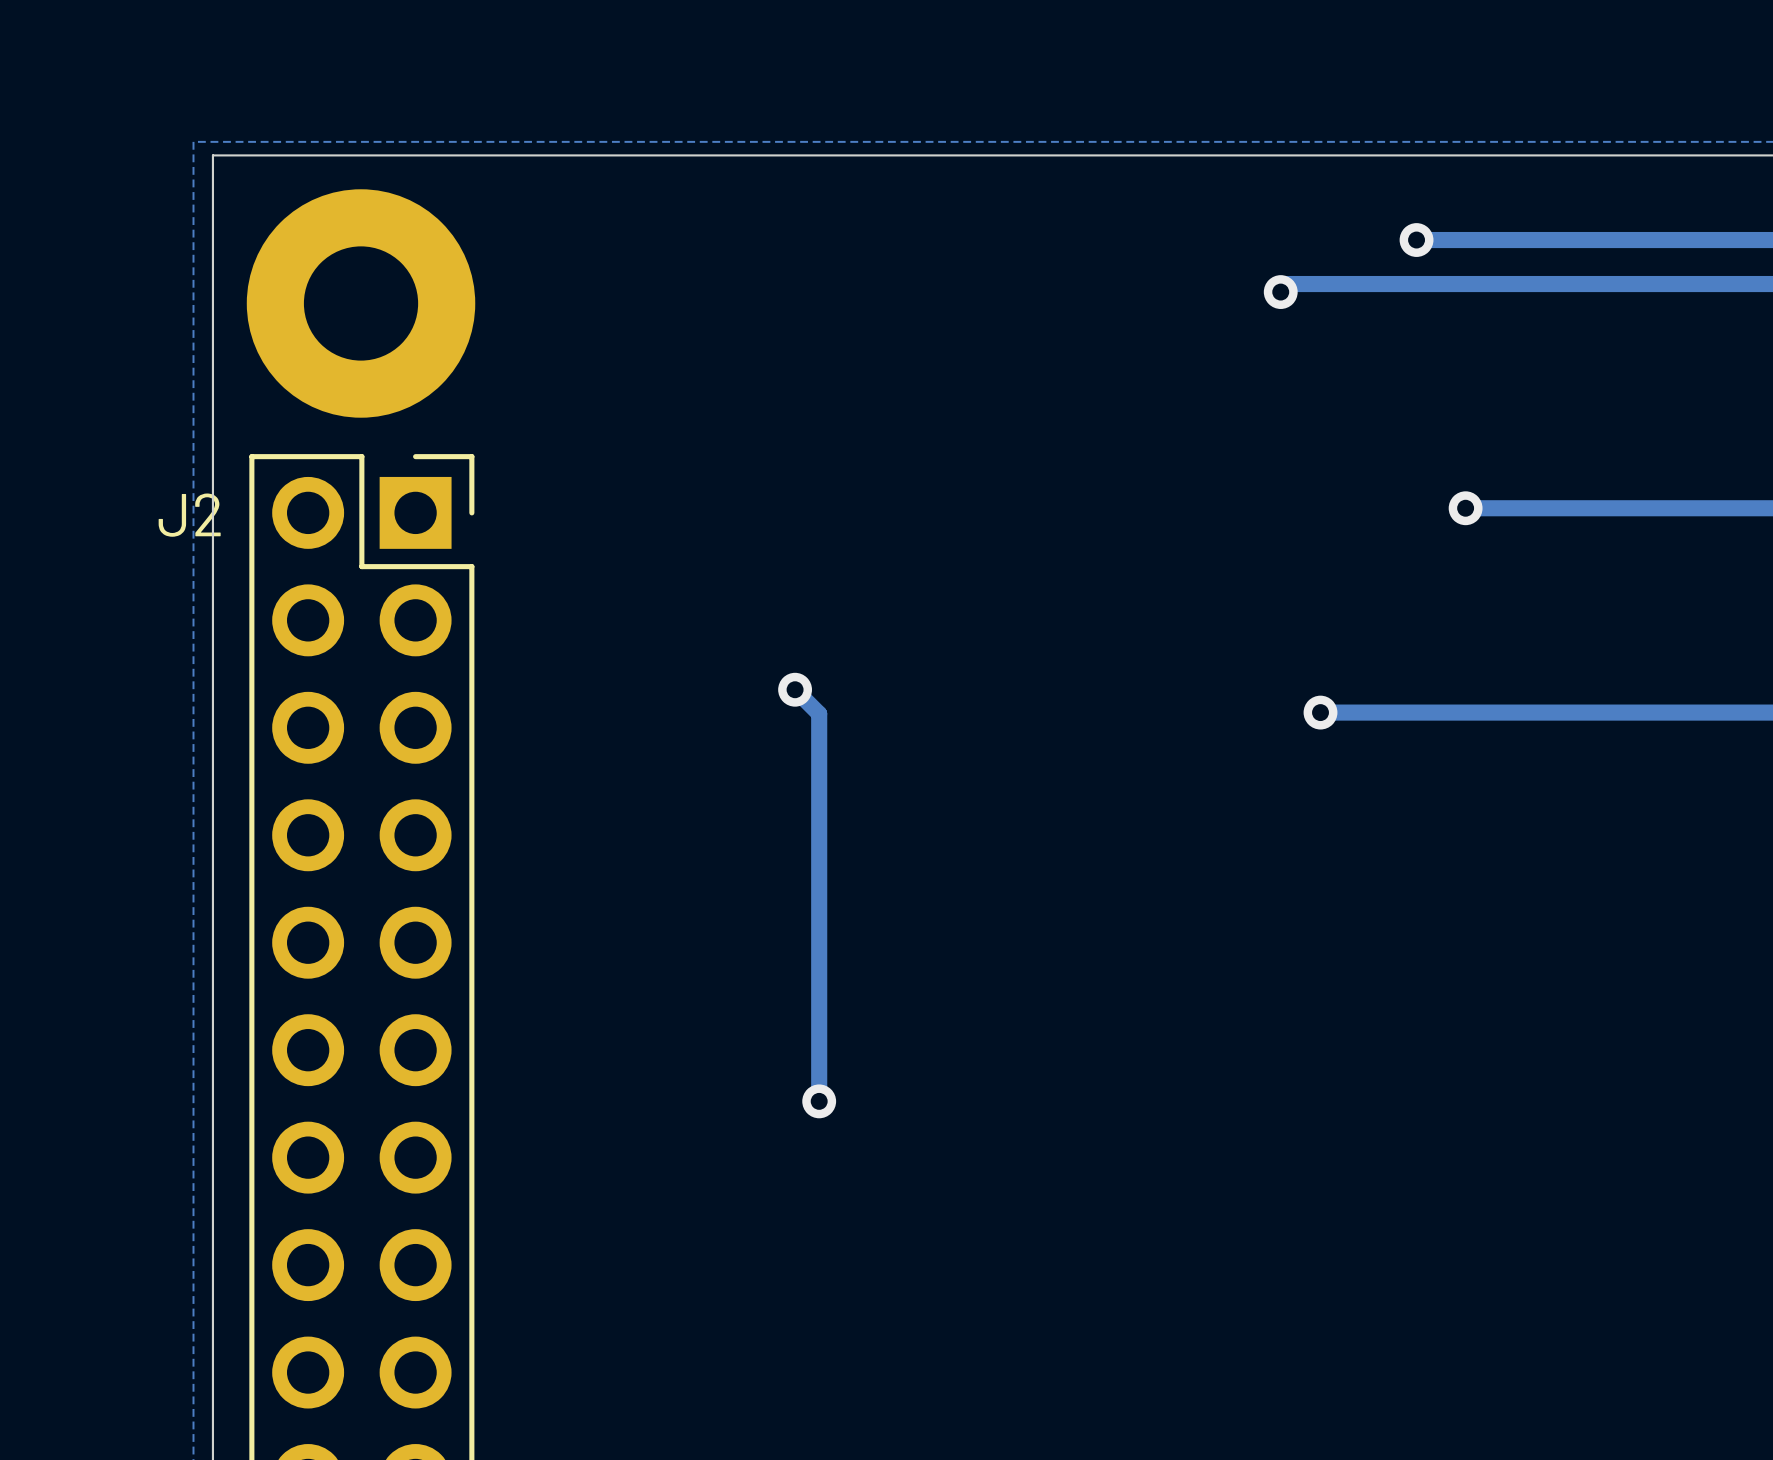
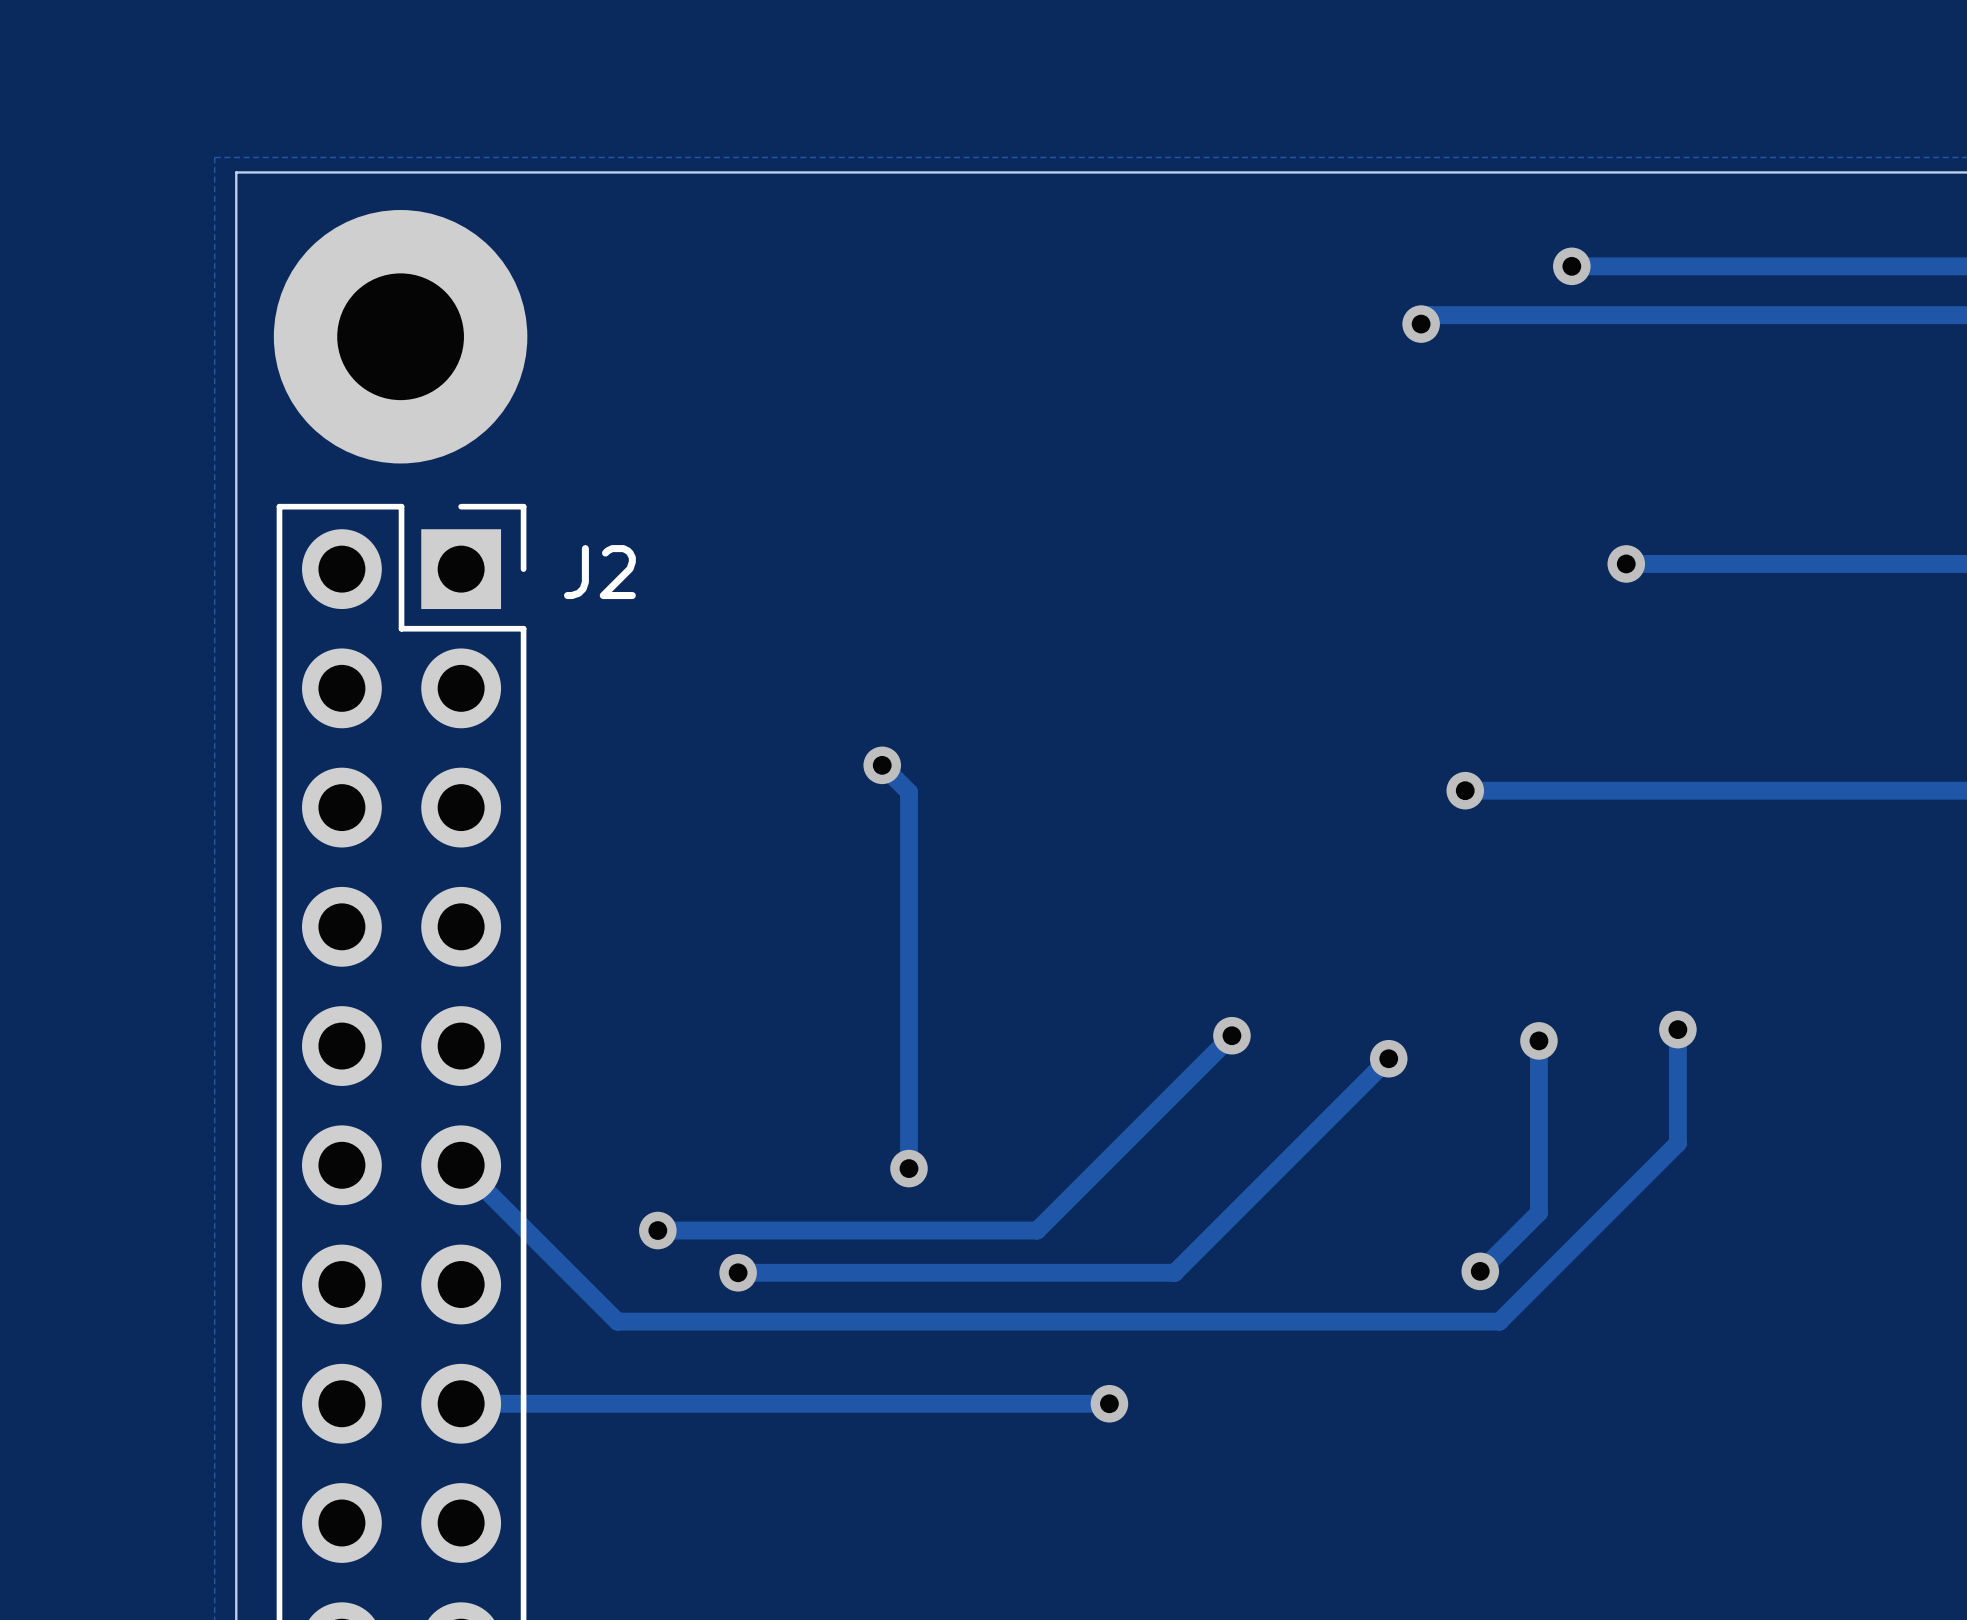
J2 name position: J2 (189, 515) -> J2 (599, 572)
track: none -> (1677, 1029) (1677, 1143) (1499, 1321) (617, 1321) (461, 1165)
via: none -> (1677, 1029)
track: none -> (1231, 1035) (1037, 1230) (657, 1230)
via: none -> (1231, 1035)
track: none -> (1538, 1040) (1538, 1212) (1480, 1271)
via: none -> (1538, 1040)
track: none -> (1388, 1058) (1174, 1272) (738, 1272)
via: none -> (1388, 1058)
track: (819, 1053) (819, 1101) -> none
via position: (819, 1101) -> (908, 1168)
via: none -> (657, 1230)
via: none -> (1480, 1271)
via: none -> (738, 1272)
track: none -> (1109, 1403) (461, 1403)
via: none -> (1109, 1403)

